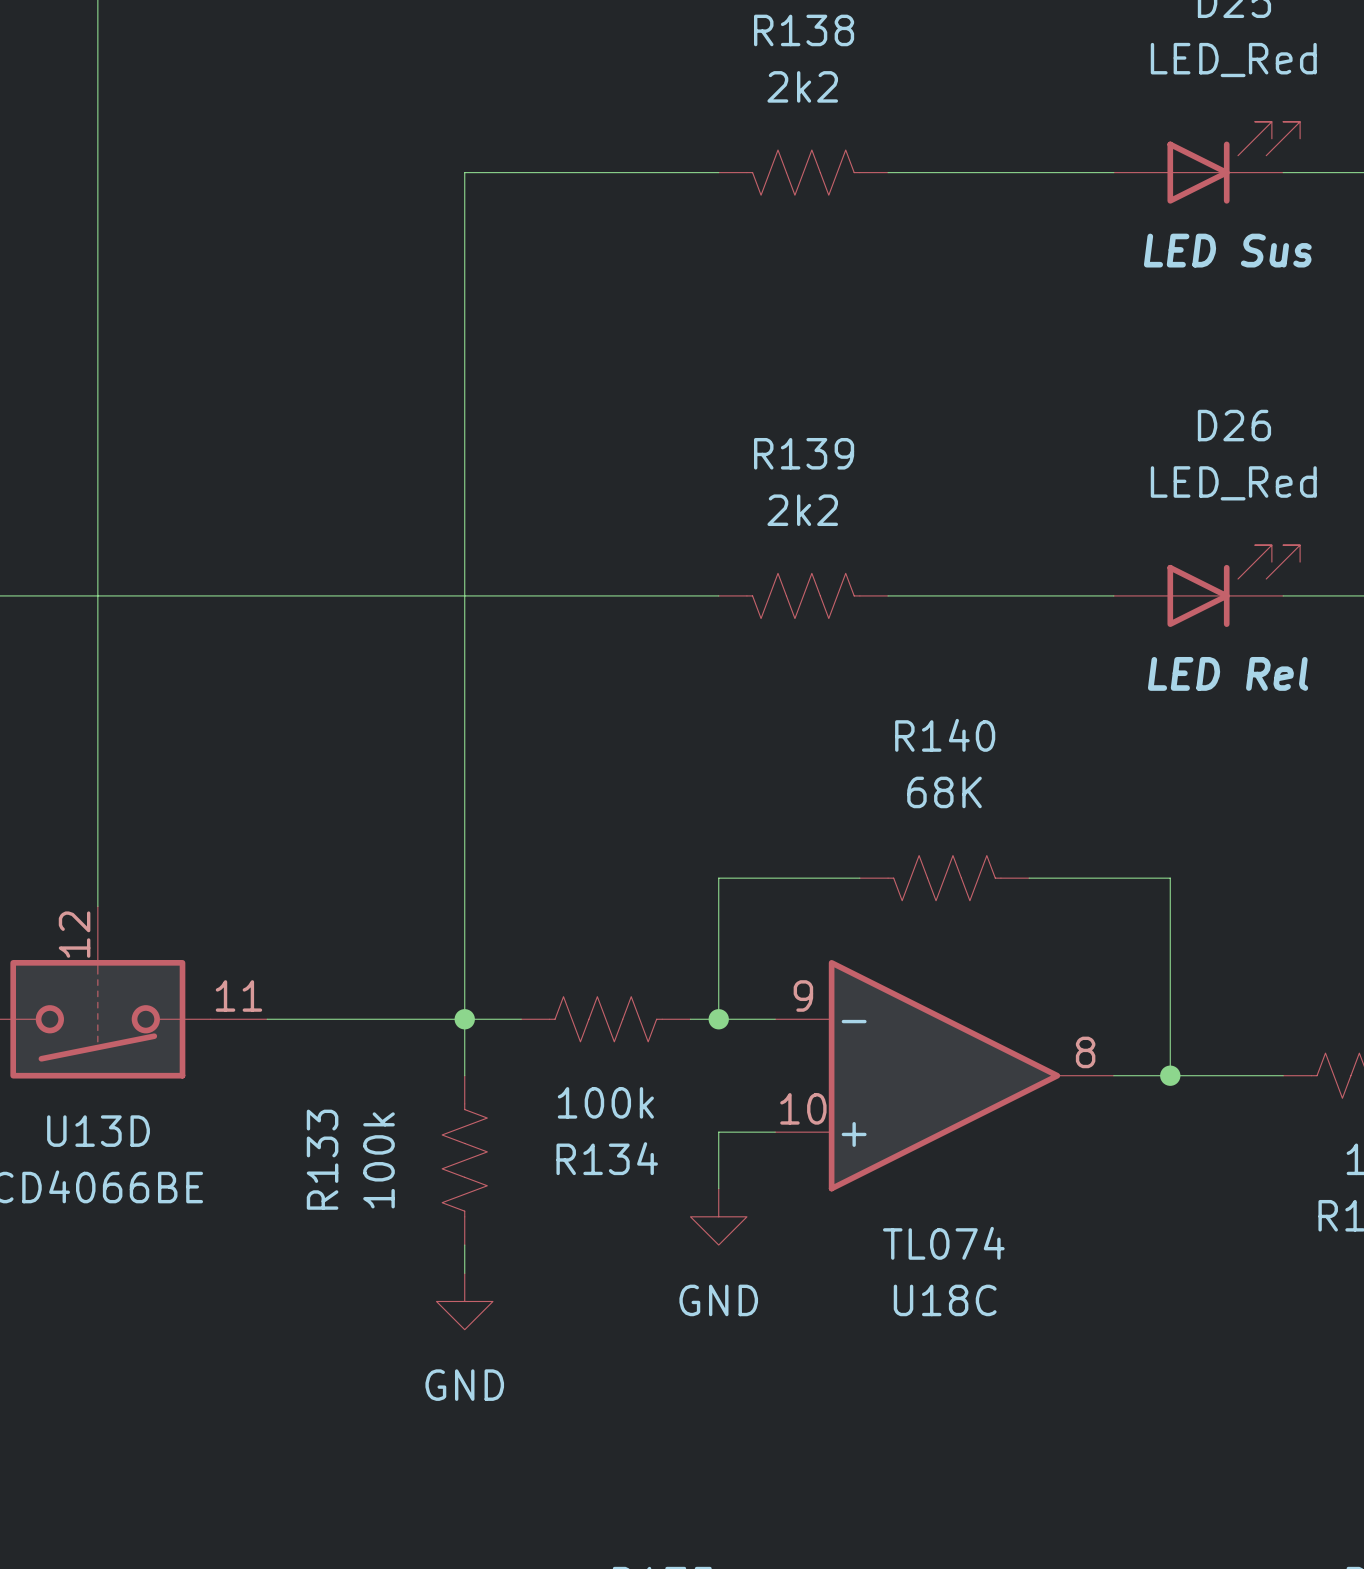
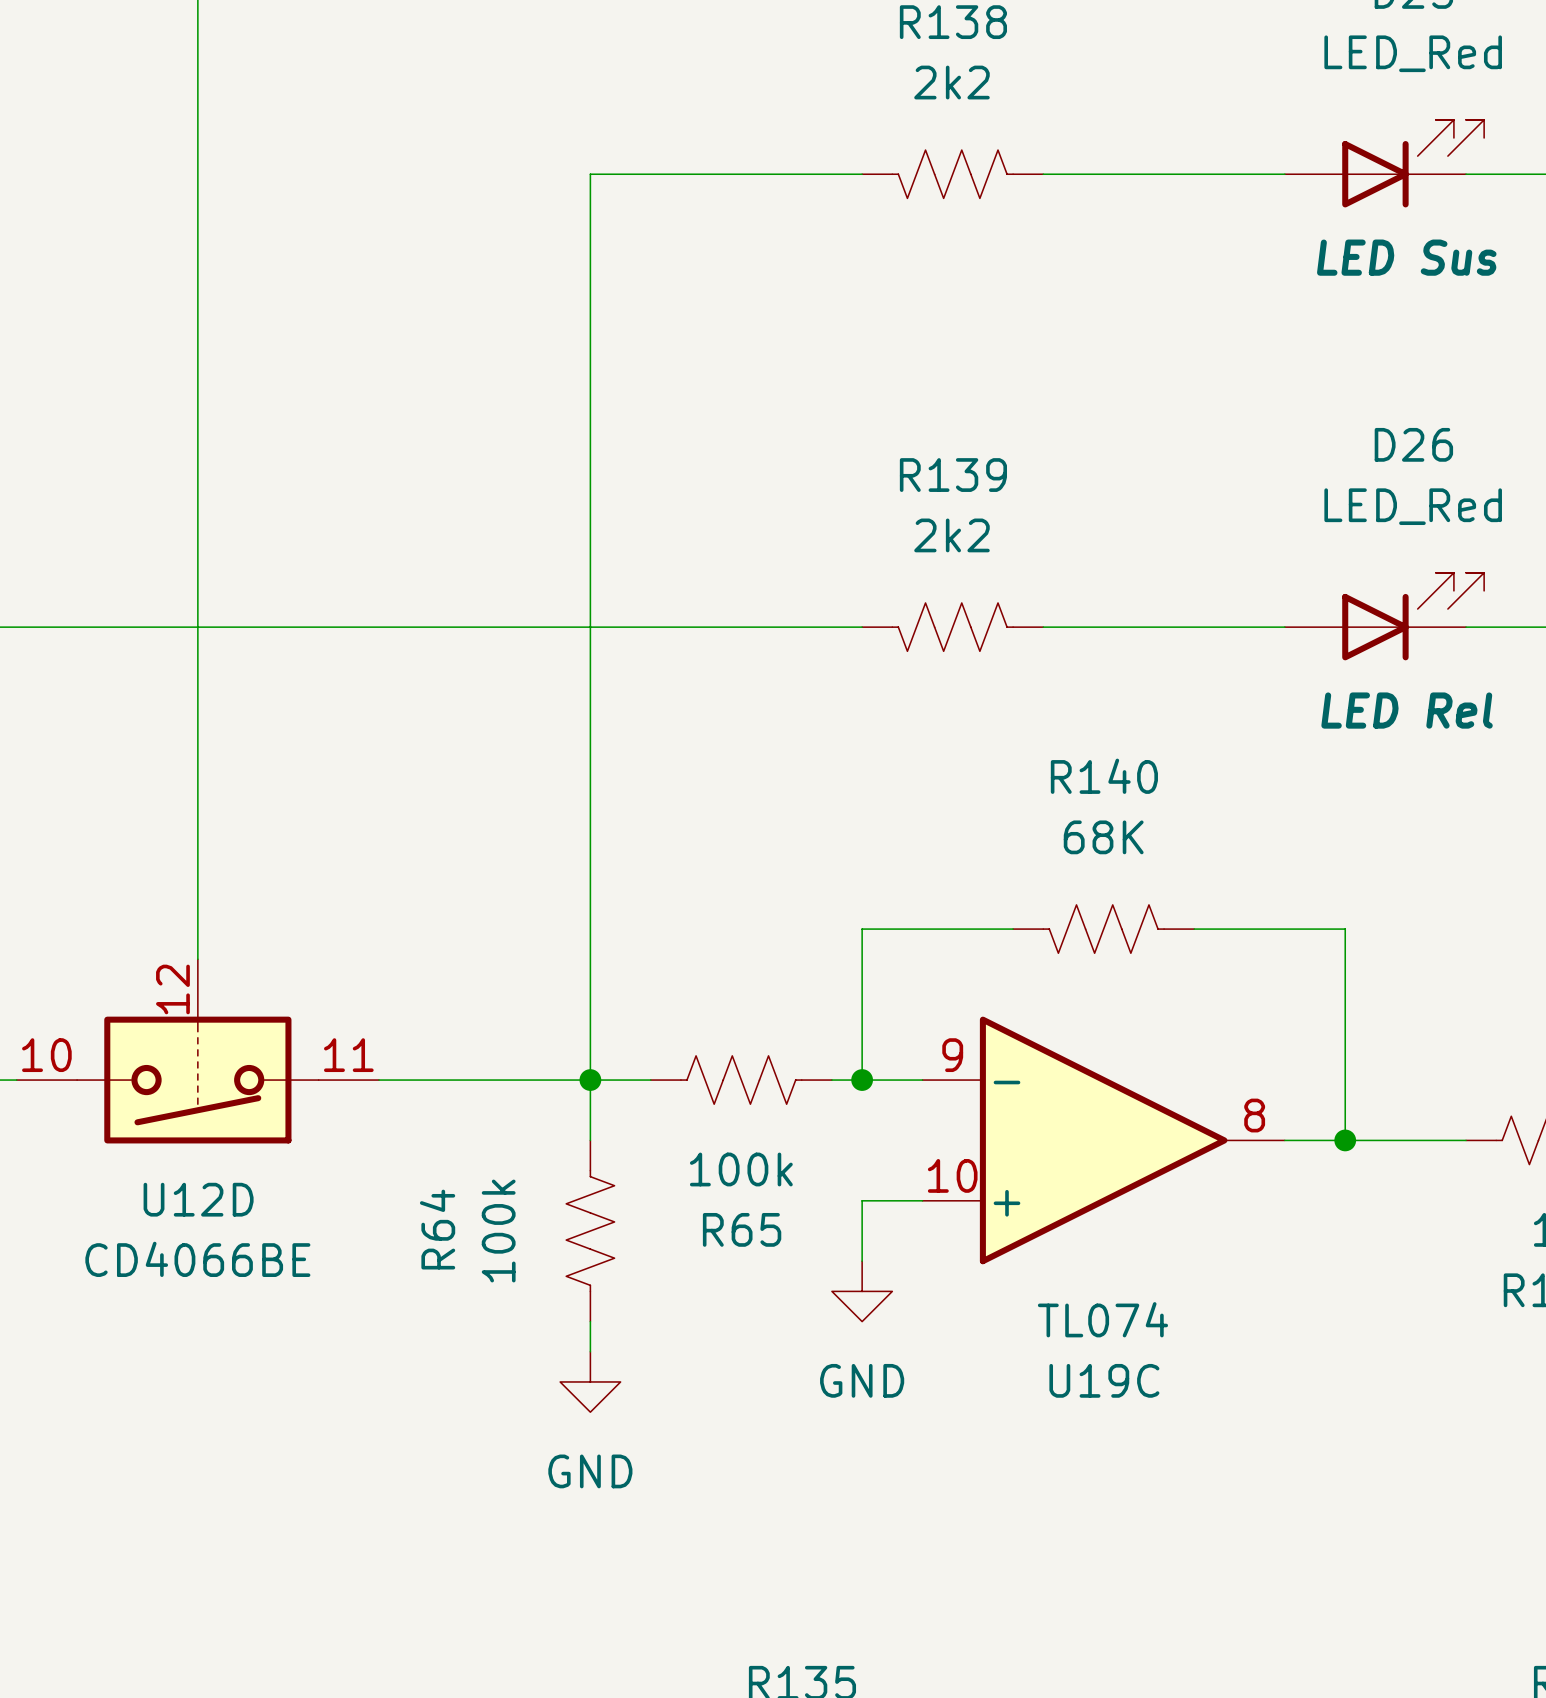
U13D name: U13D (98, 1131) -> U12D (198, 1199)
R134 name: R134 (607, 1158) -> R65 (742, 1229)
R133 name: R133 (322, 1159) -> R64 (437, 1229)
U18C name: U18C (945, 1300) -> U19C (1104, 1380)

